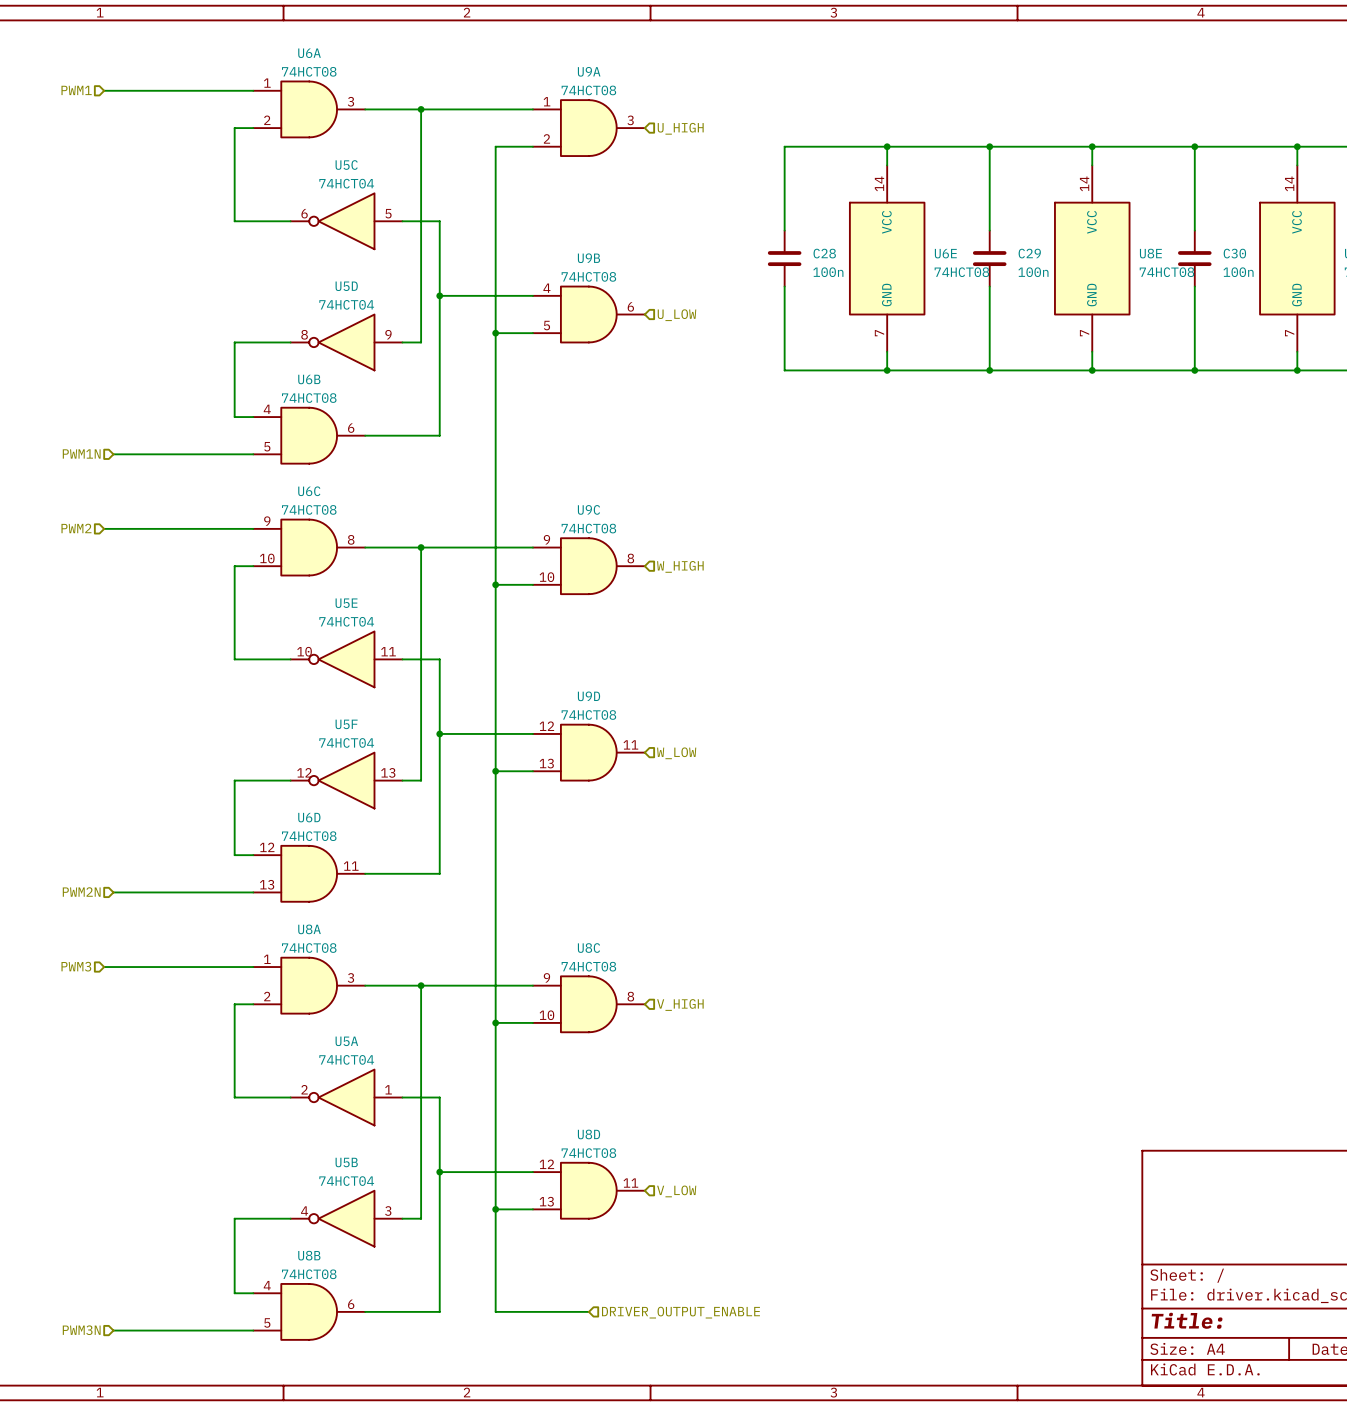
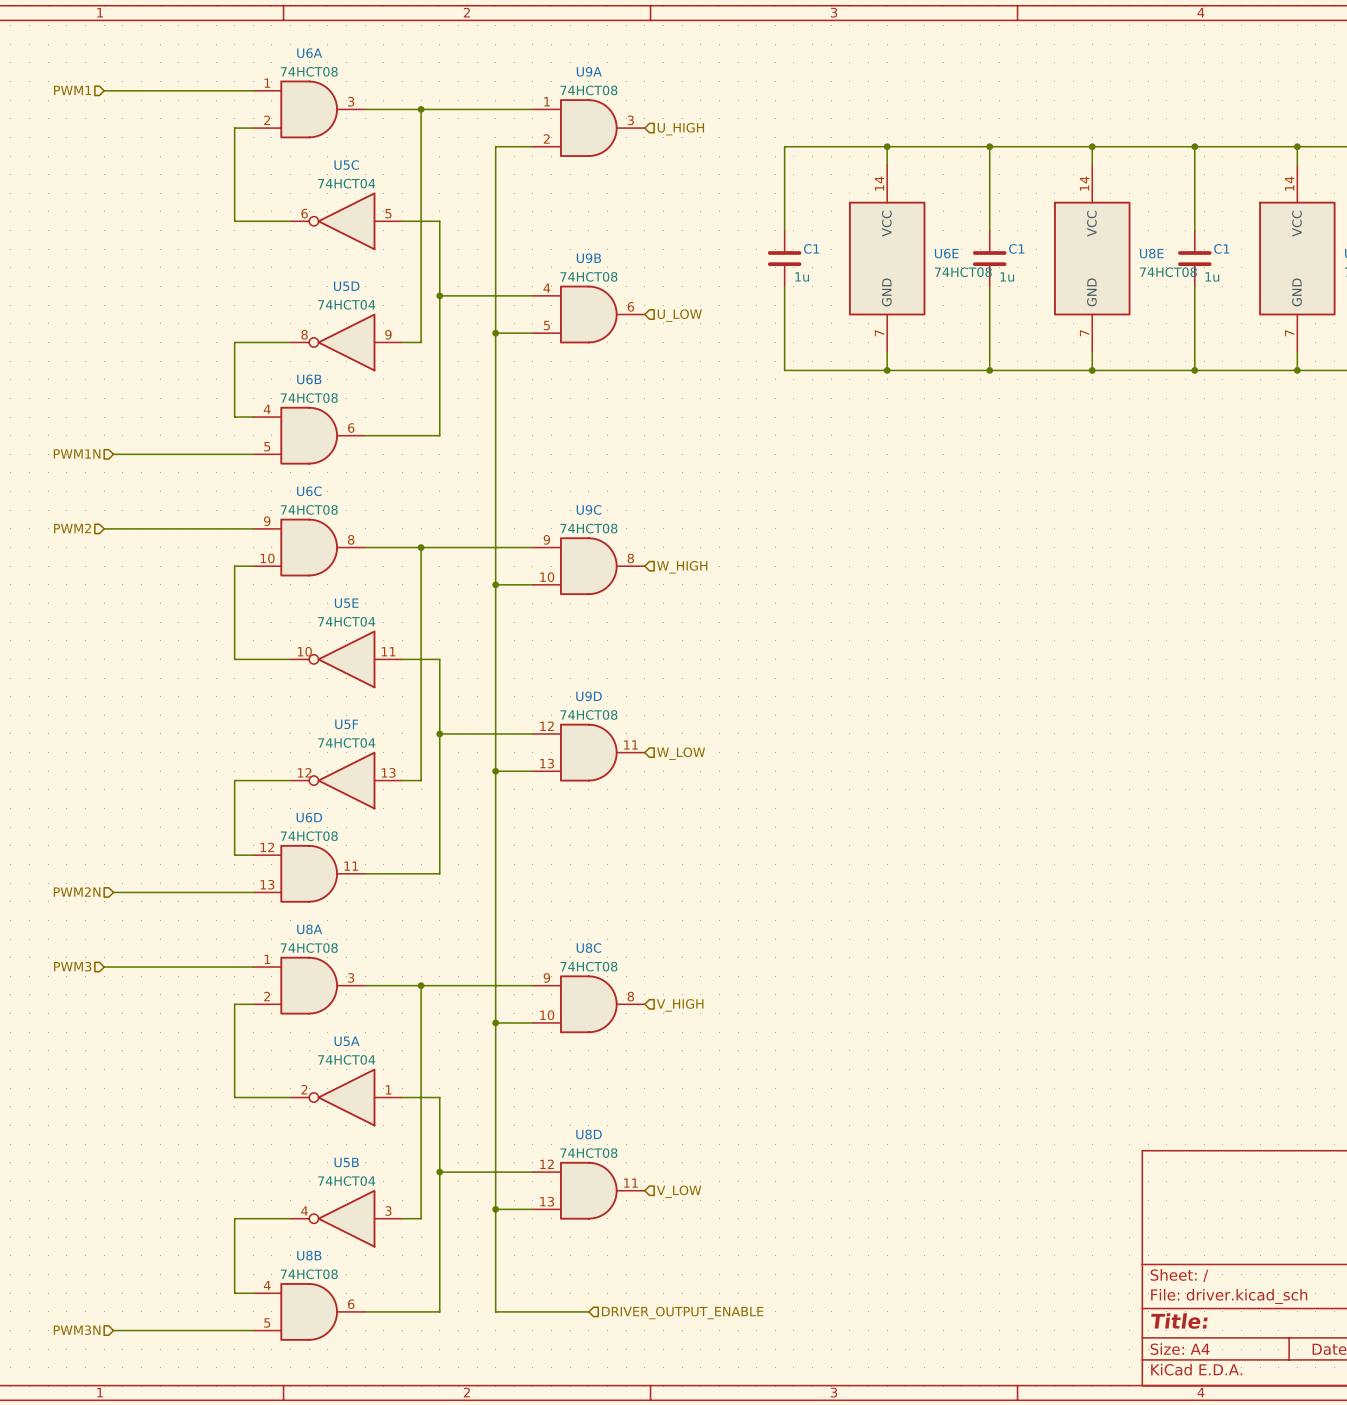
C28 name: C28 (824, 253) -> C1 (811, 248)
C29 name: C29 (1029, 253) -> C1 (1016, 248)
C30 name: C30 (1234, 253) -> C1 (1221, 248)
C28 value: 100n (828, 272) -> 1u (802, 276)
C29 value: 100n (1033, 272) -> 1u (1007, 276)
C30 value: 100n (1238, 272) -> 1u (1212, 276)

